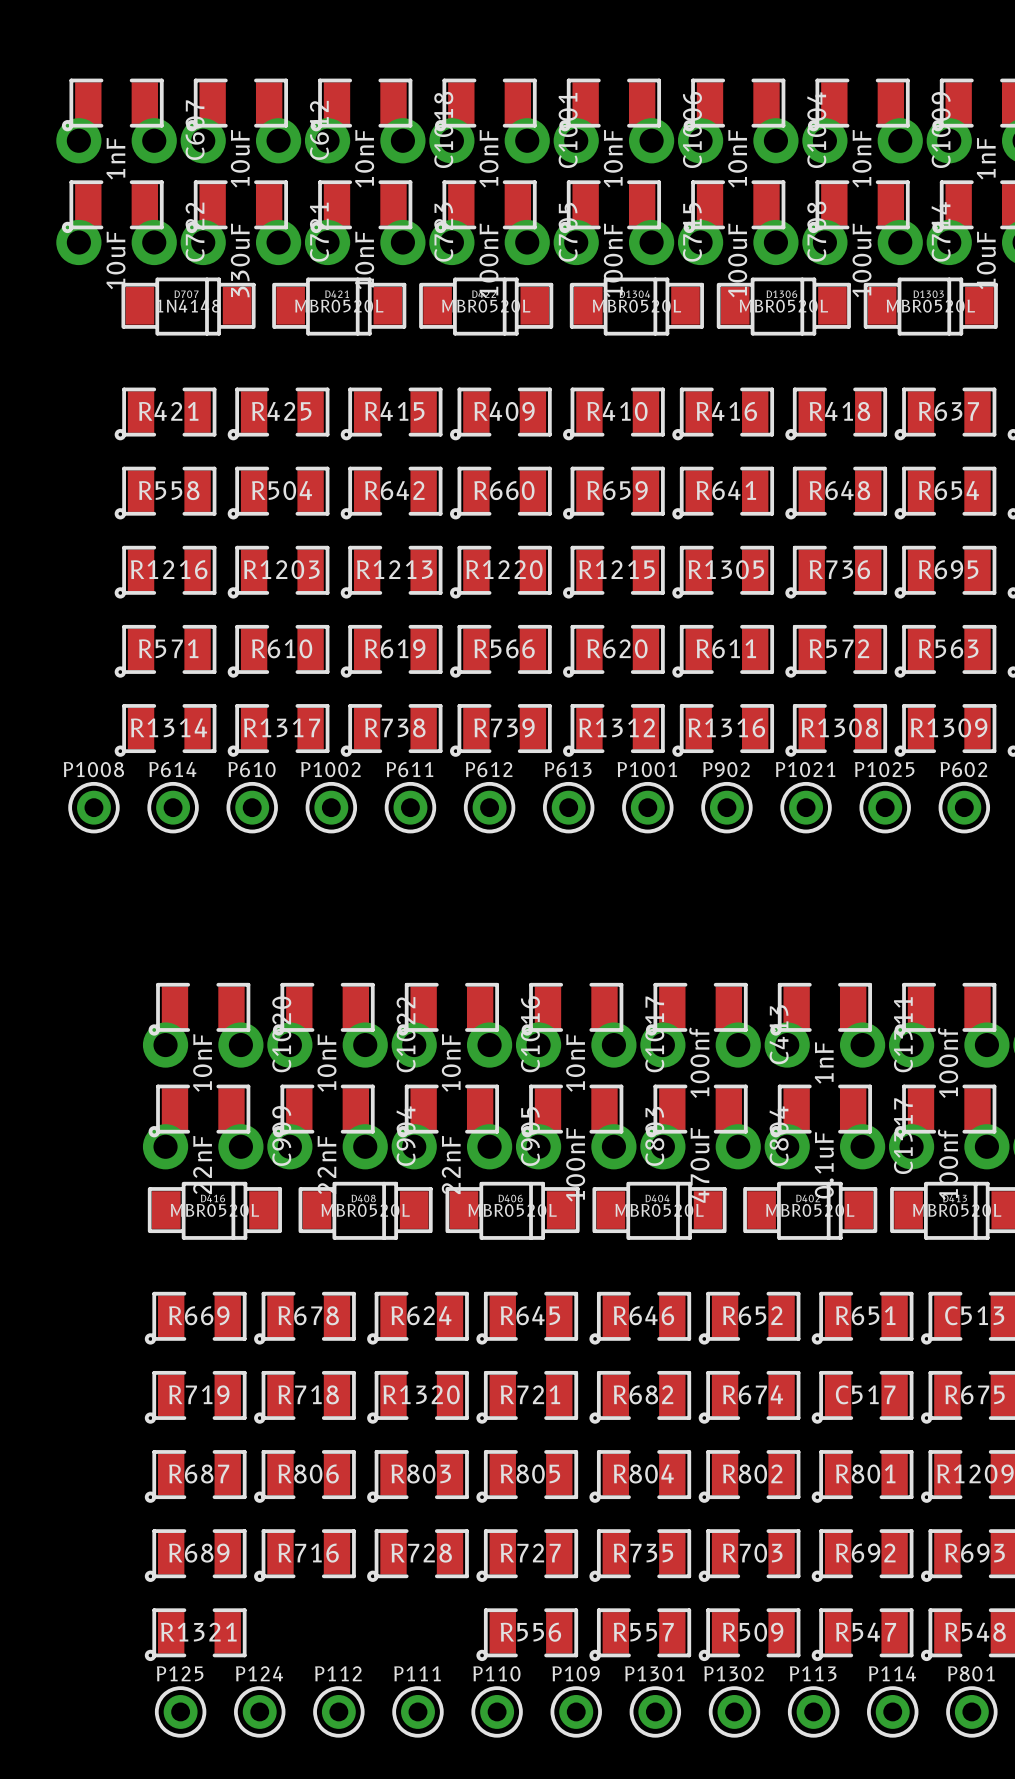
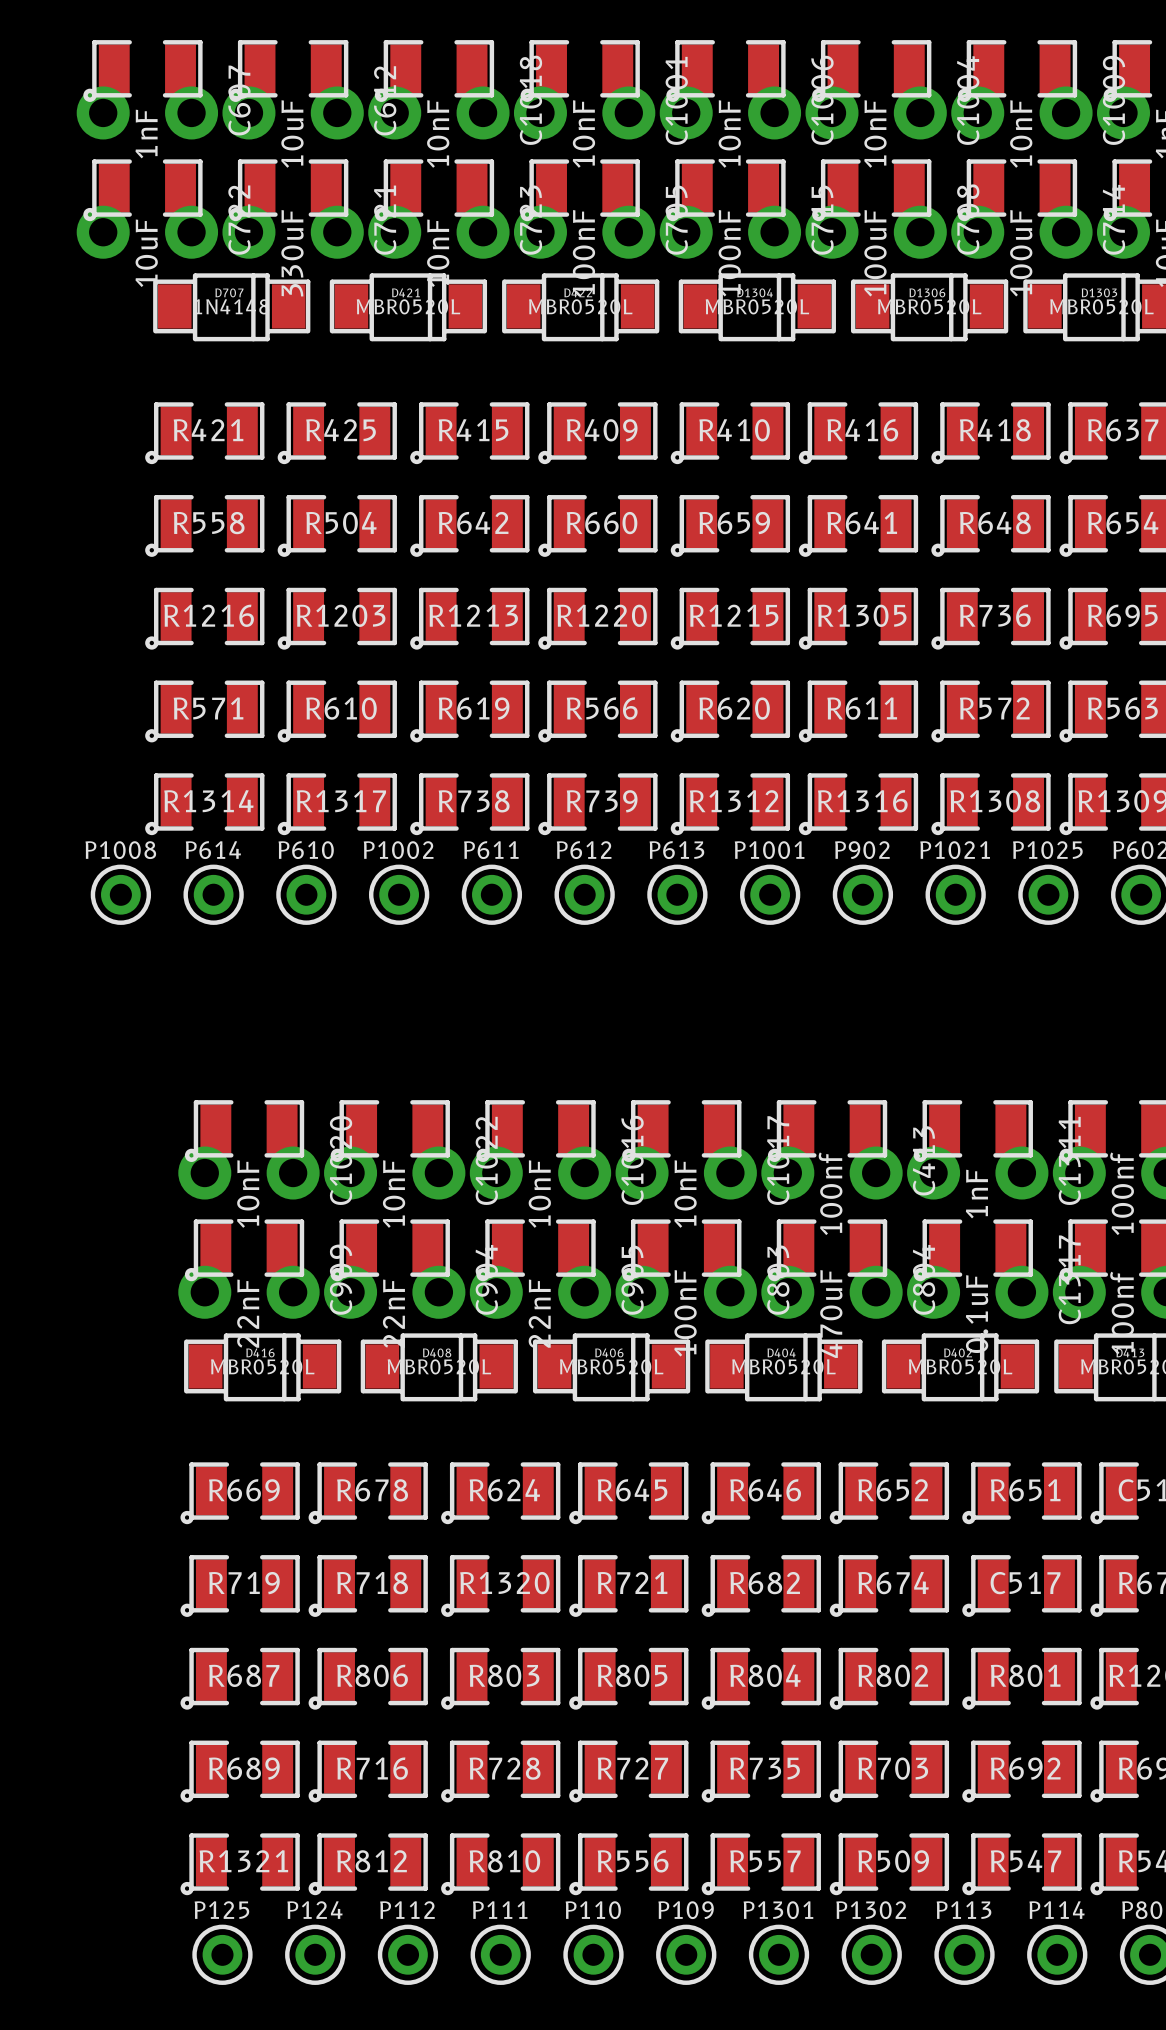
R812: none -> (368, 1864)
R810: none -> (500, 1864)

